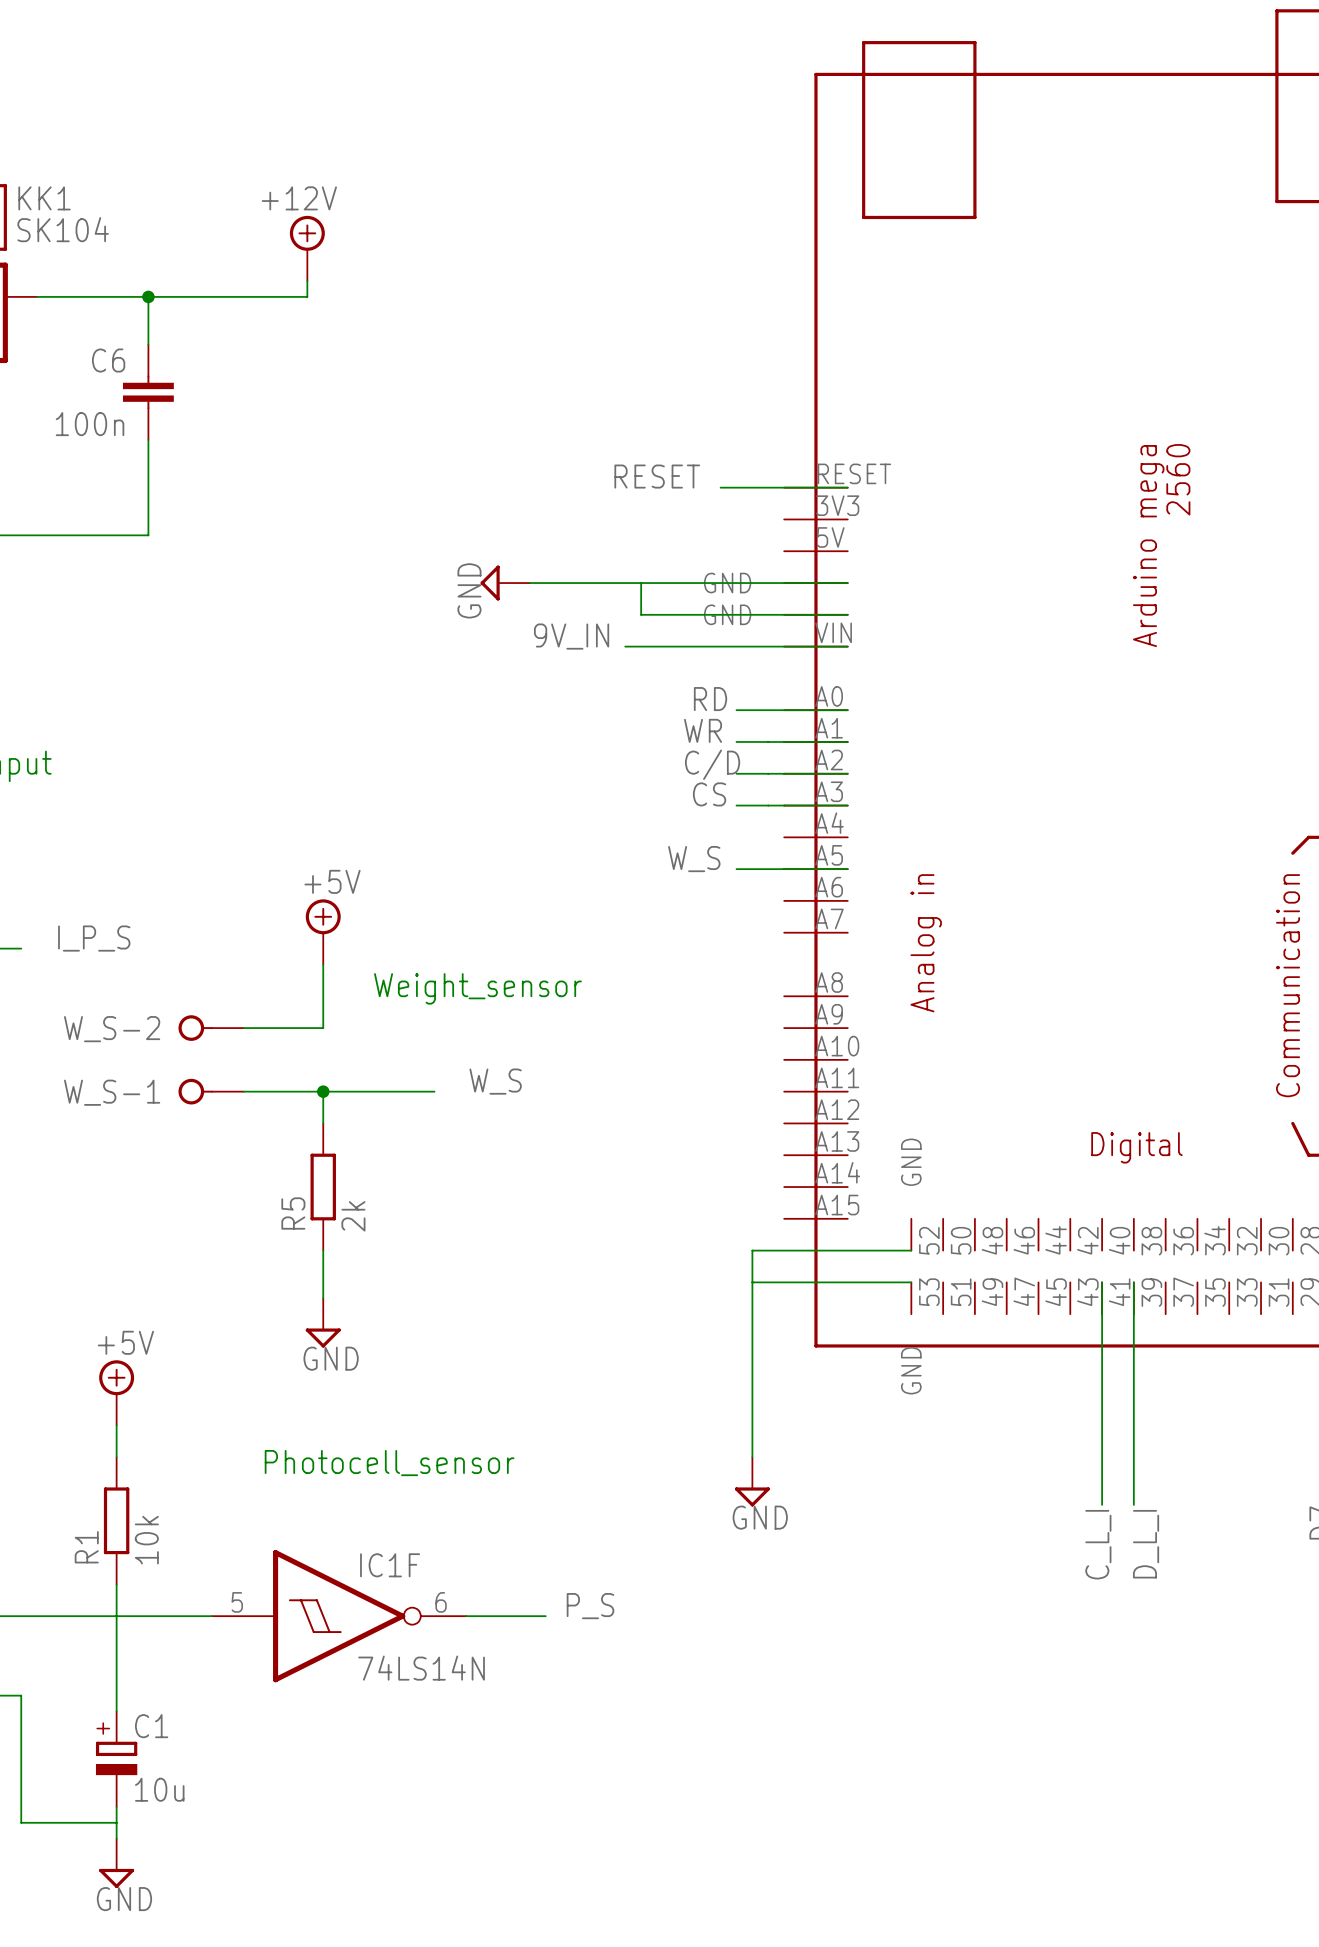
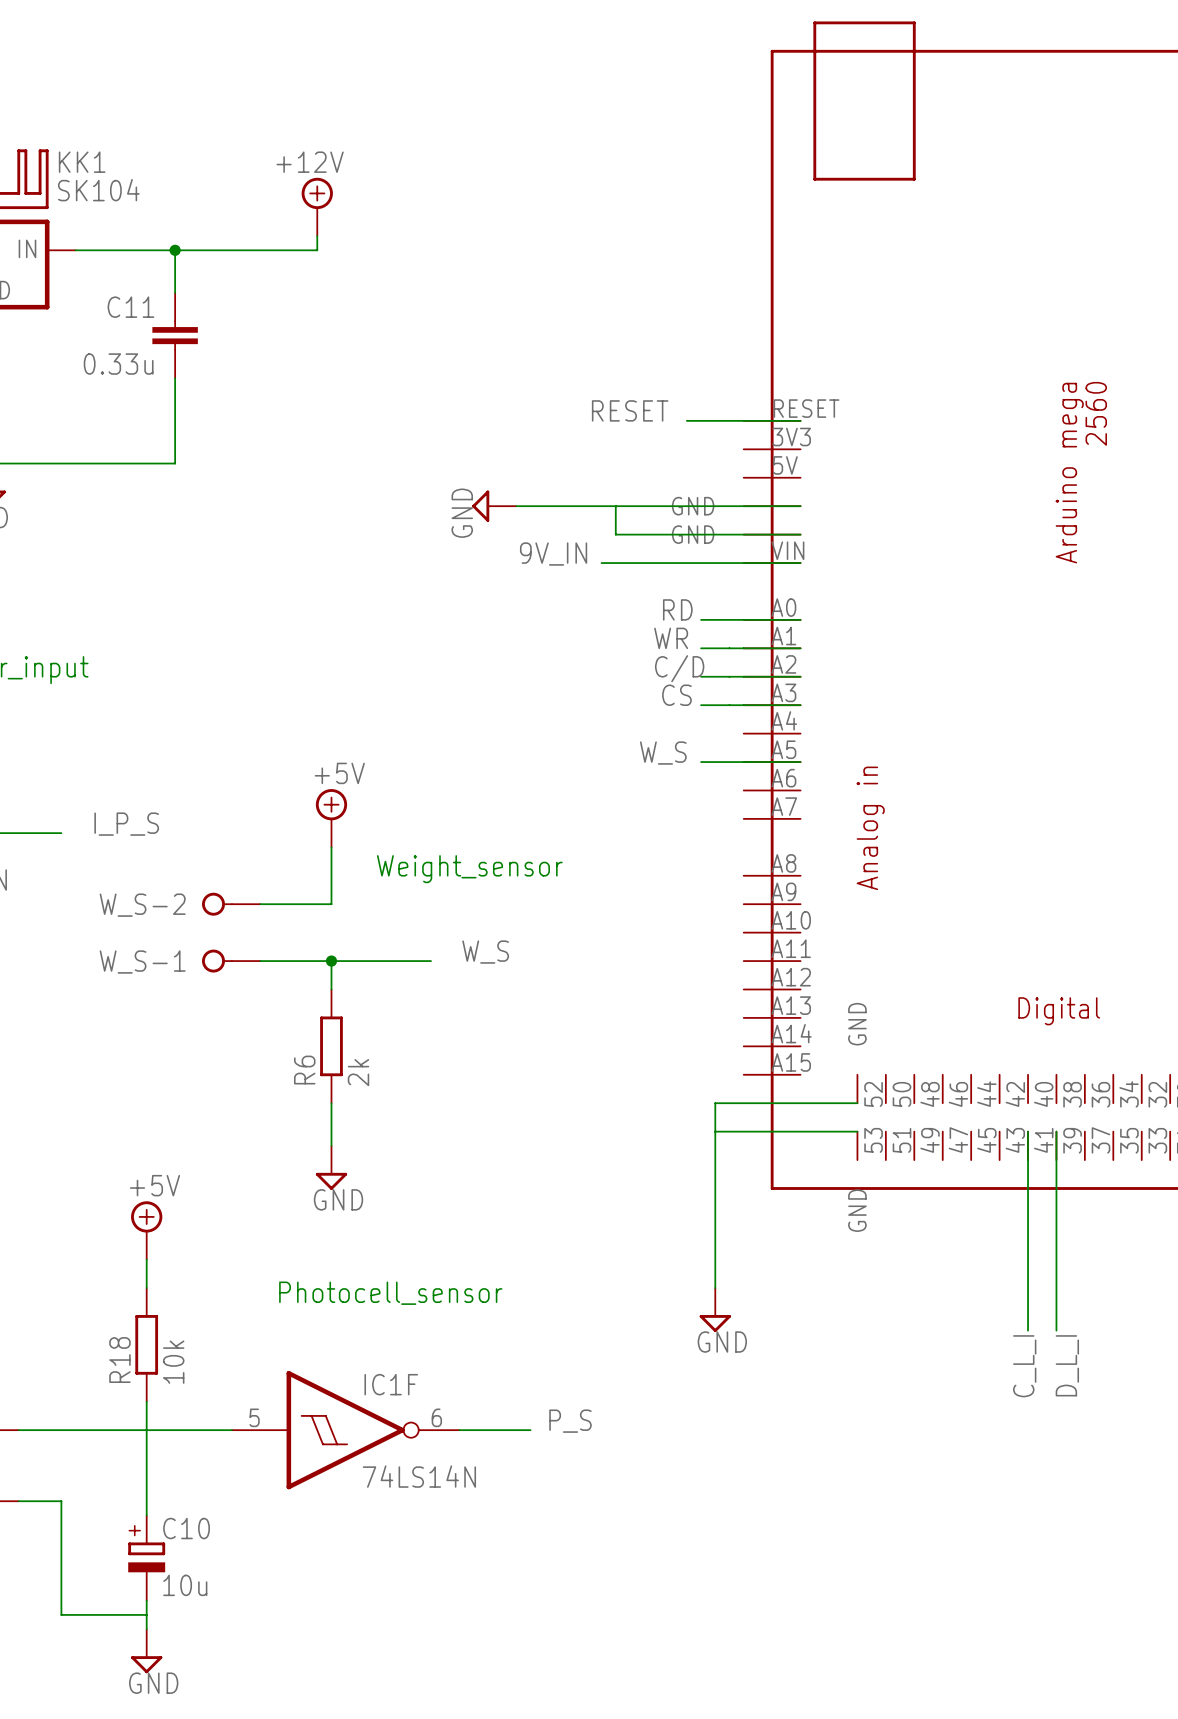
C6 name: C6 (108, 360) -> C11 (131, 307)
C6 value: 100n (90, 424) -> 0.33u (118, 364)
R5 name: R5 (293, 1213) -> R6 (304, 1070)
R1 name: R1 (86, 1547) -> R18 (119, 1360)
C1 name: C1 (151, 1726) -> C10 (186, 1528)

